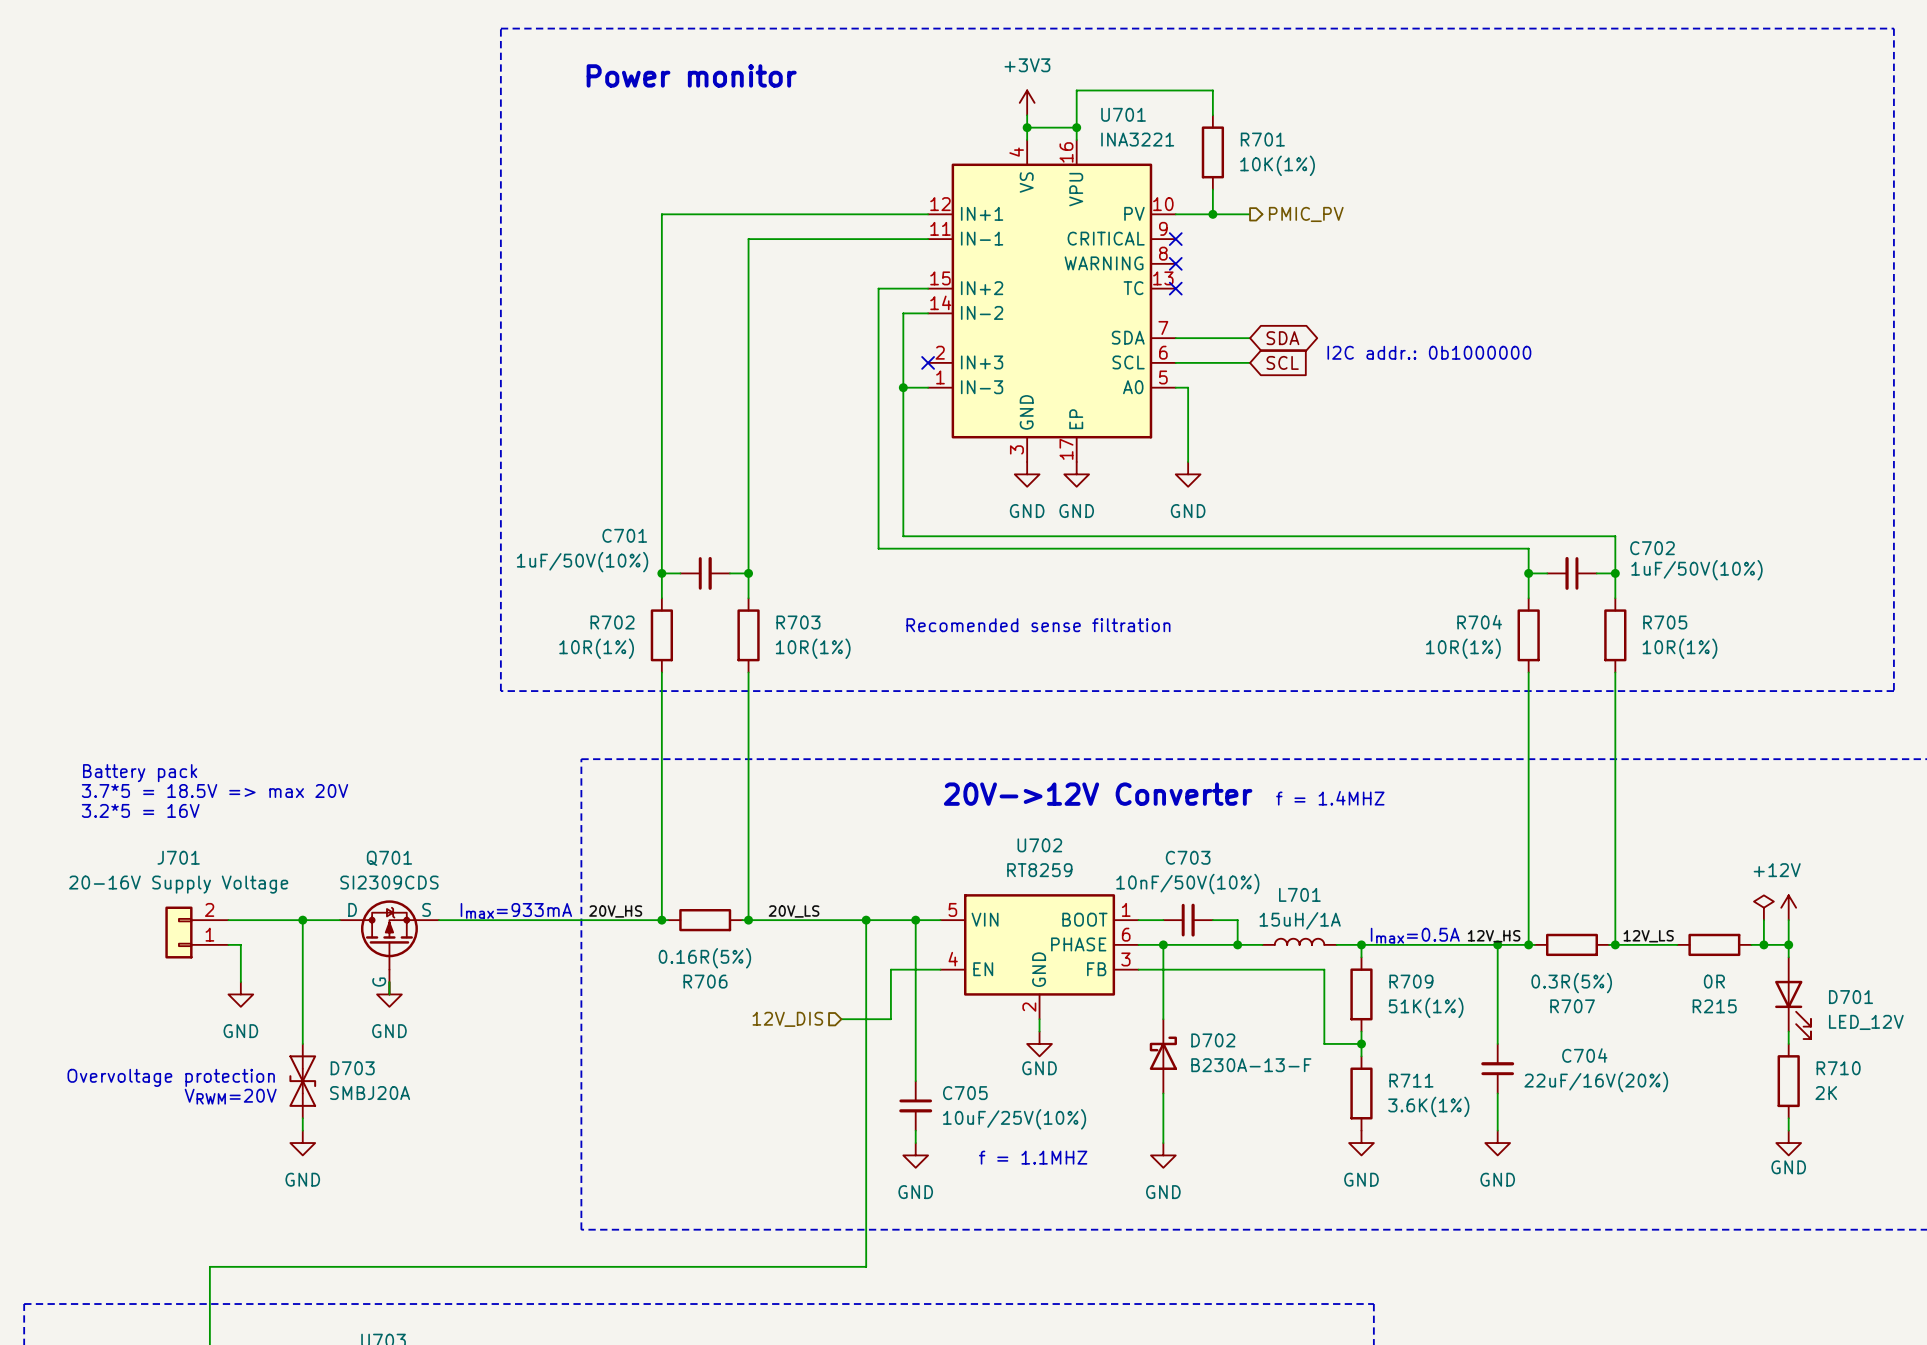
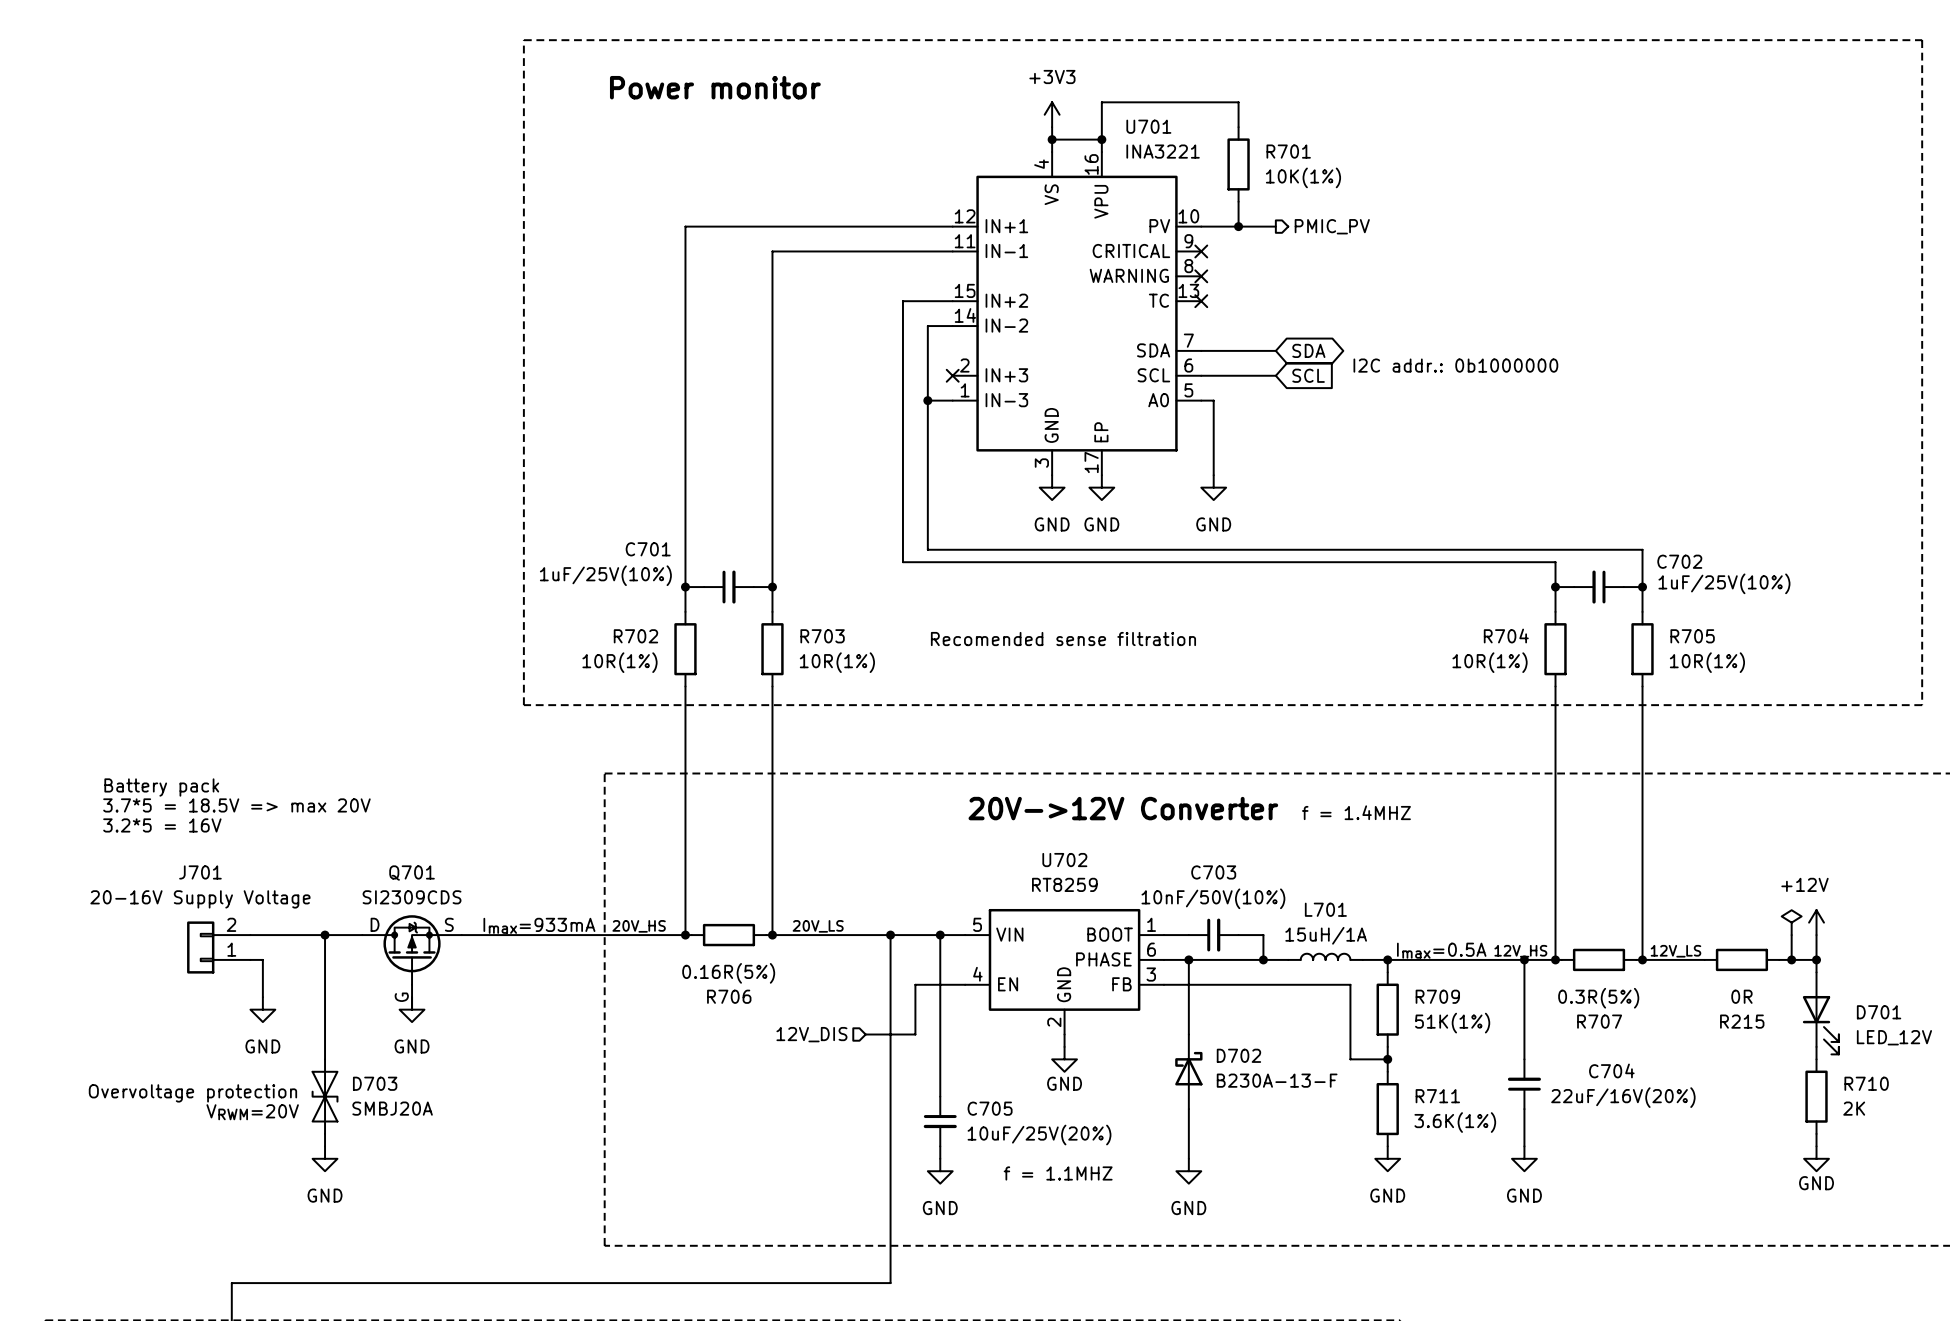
C701 value: 1uF/50V(10%) (582, 562) -> 1uF/25V(10%) (605, 575)
C702 value: 1uF/50V(10%) (1696, 570) -> 1uF/25V(10%) (1724, 583)
C705 value: 10uF/25V(10%) (1014, 1119) -> 10uF/25V(20%) (1039, 1135)

